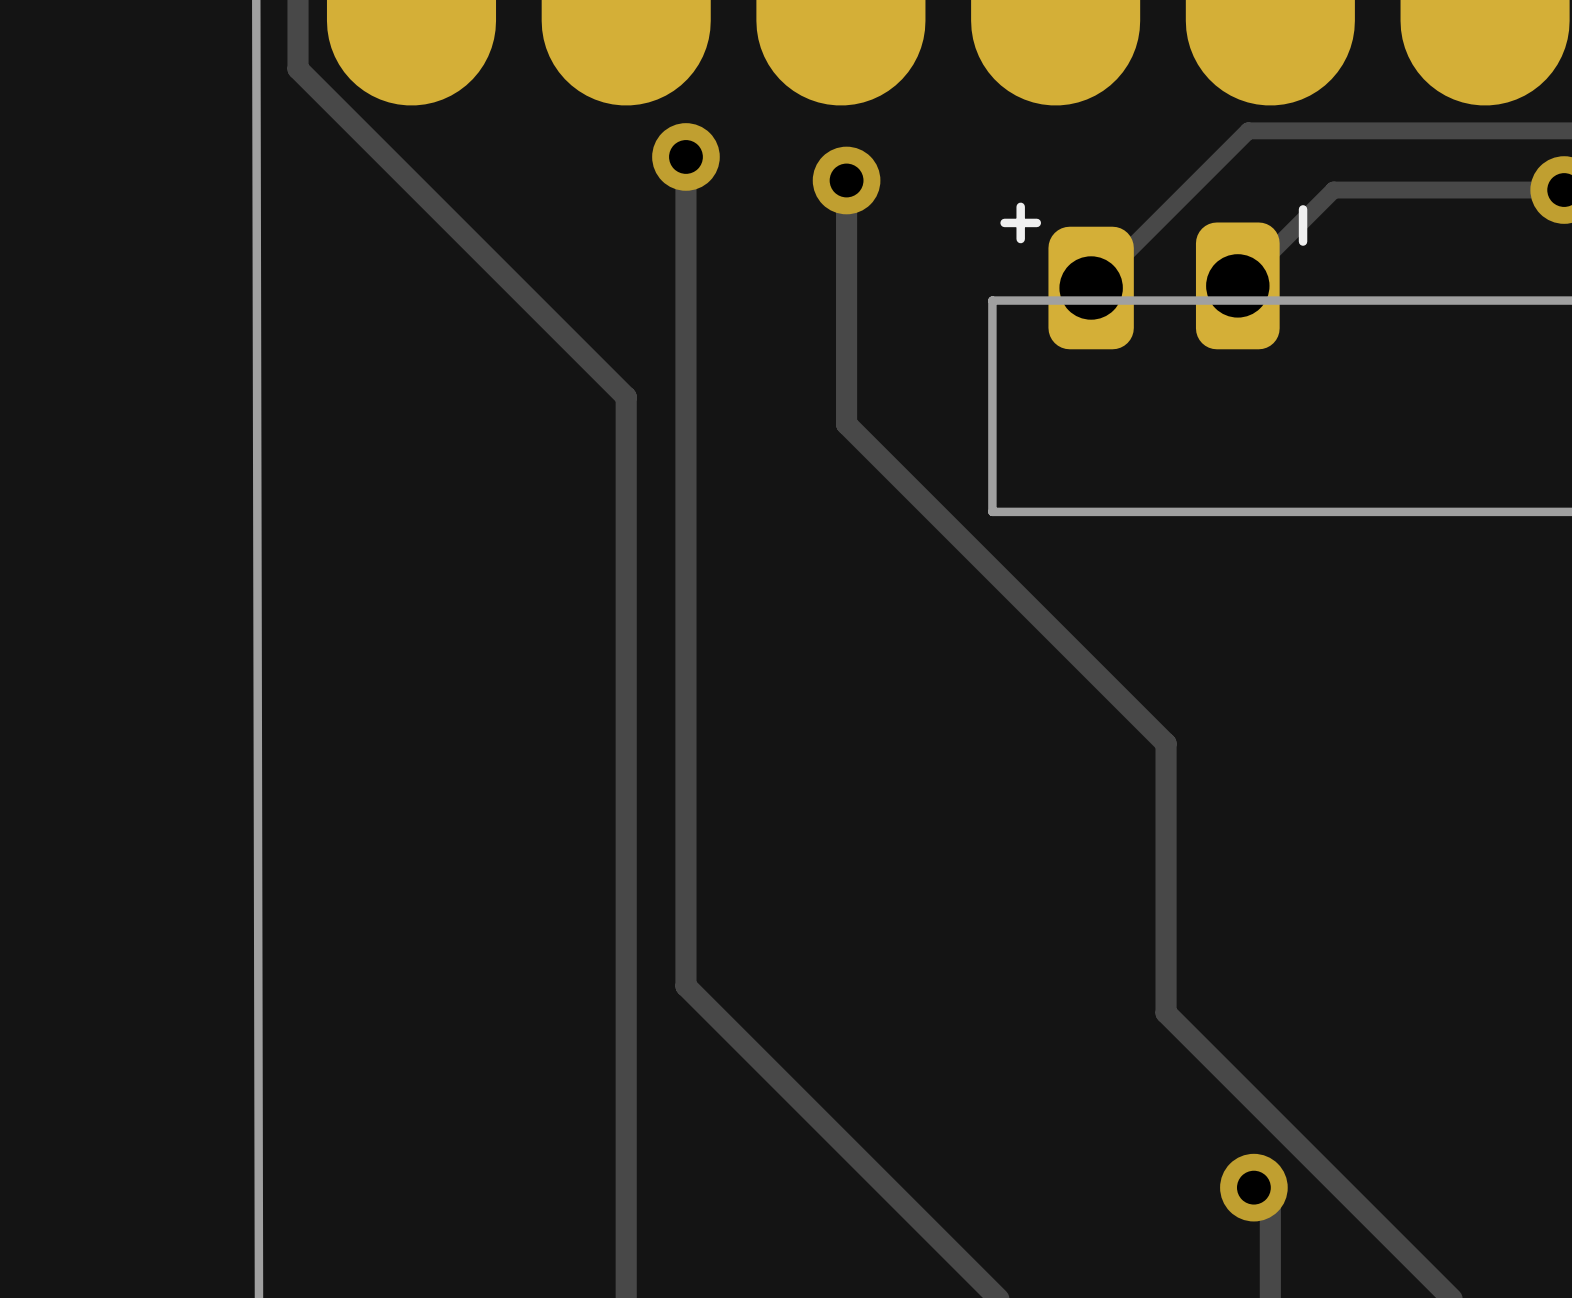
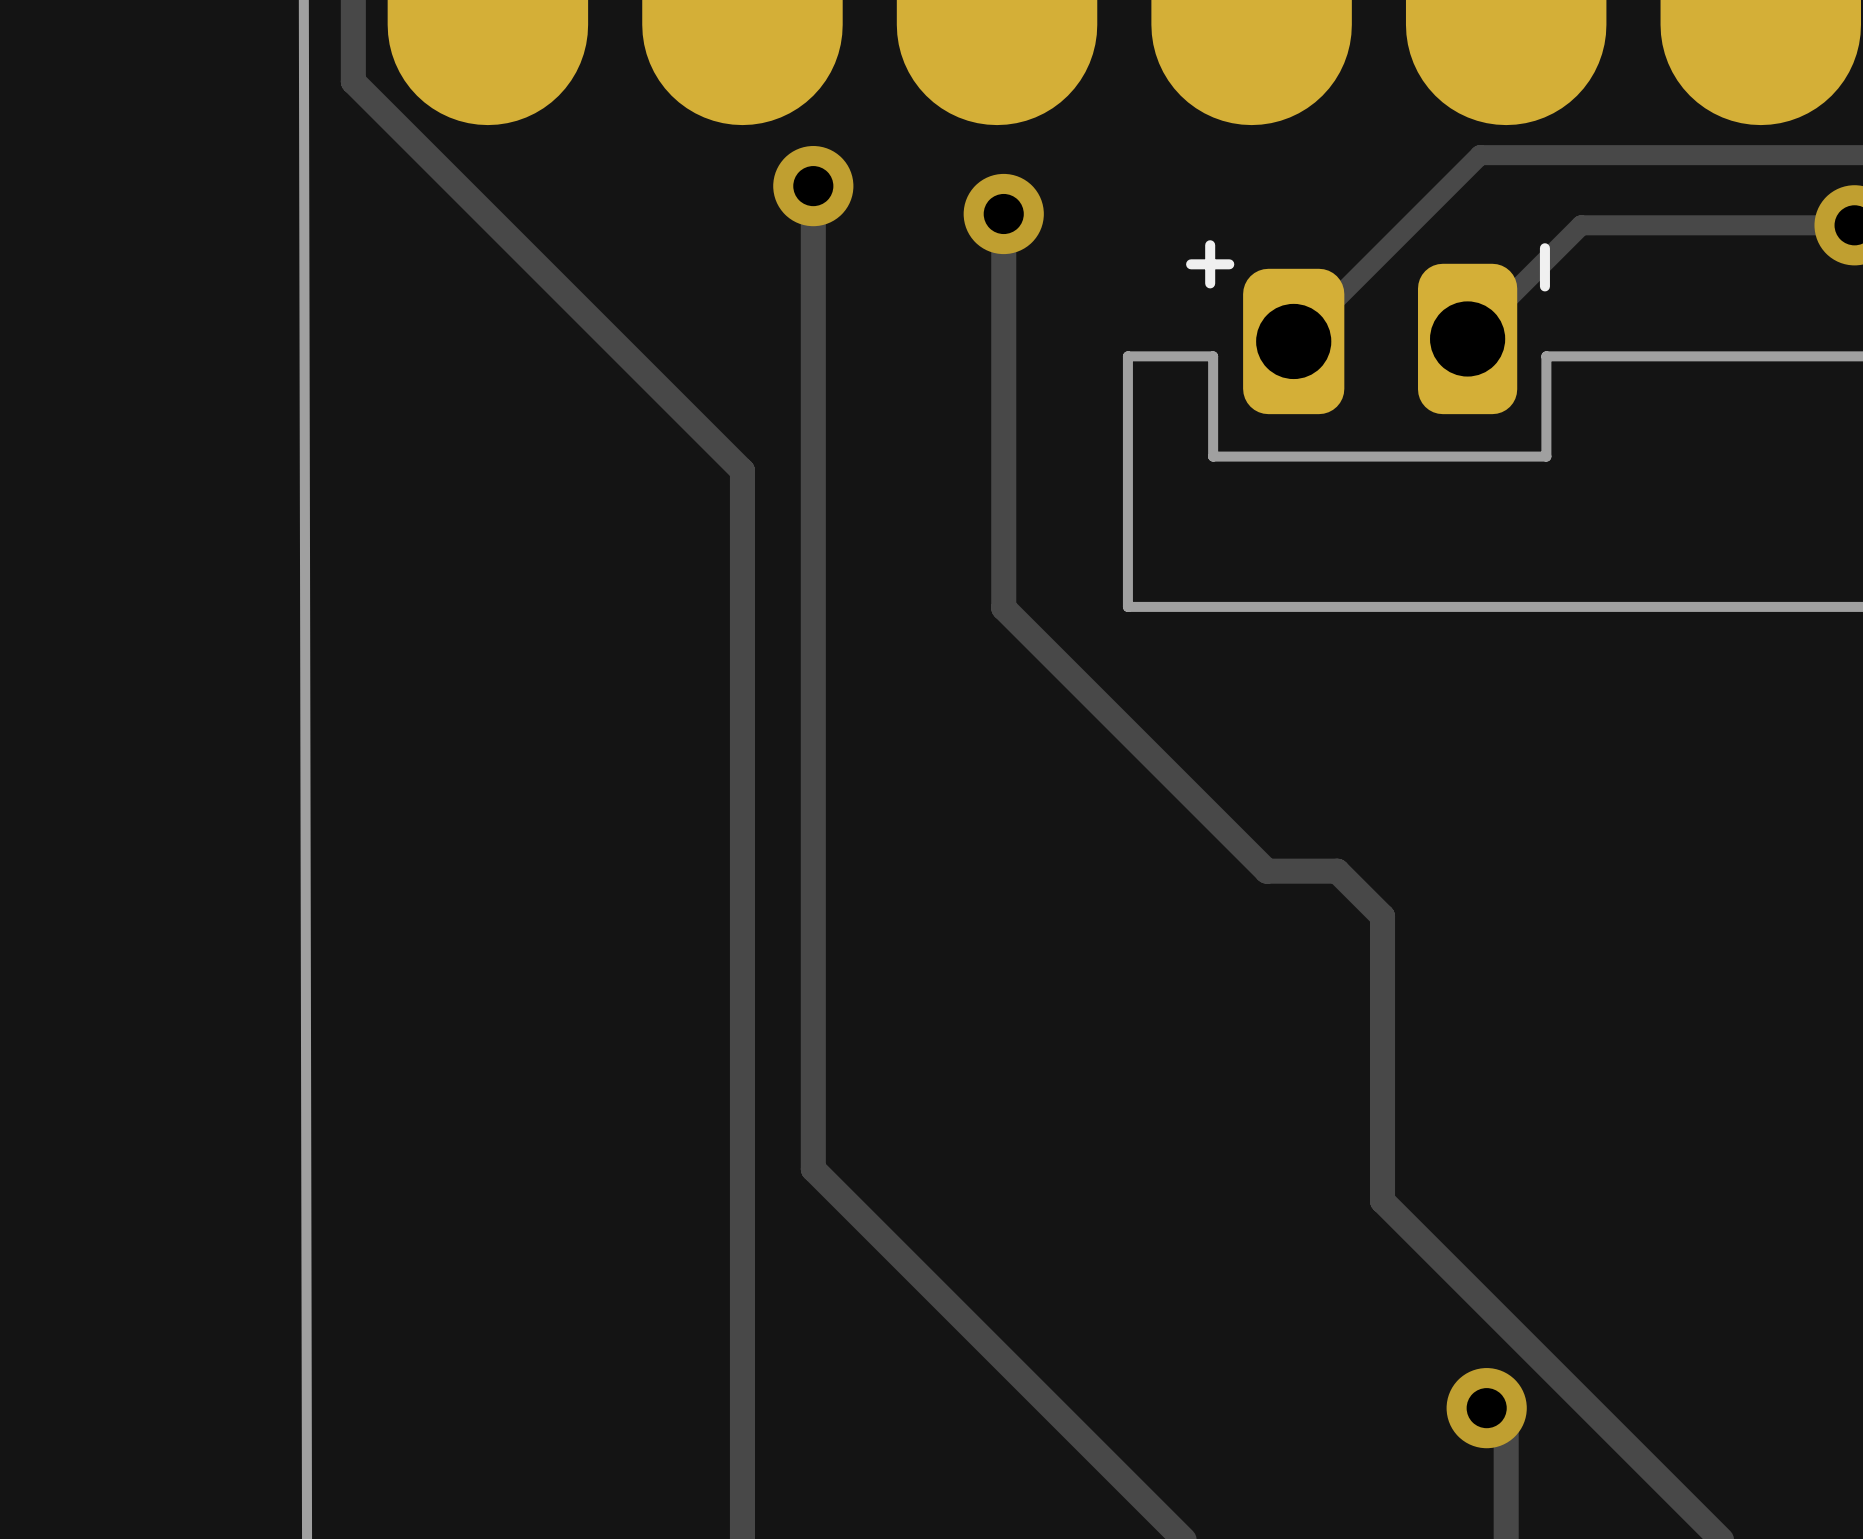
board edge: (992, 300) (992, 511) -> (1176, 356) (1127, 356) (1127, 606) (1176, 606)
board edge: (1023, 300) (1304, 300) -> (1213, 356) (1213, 456) (1546, 456) (1546, 356)
track: (846, 424) (1166, 743) (1166, 772) -> (1003, 502) (1003, 608) (1266, 871) (1337, 871) (1382, 916)

